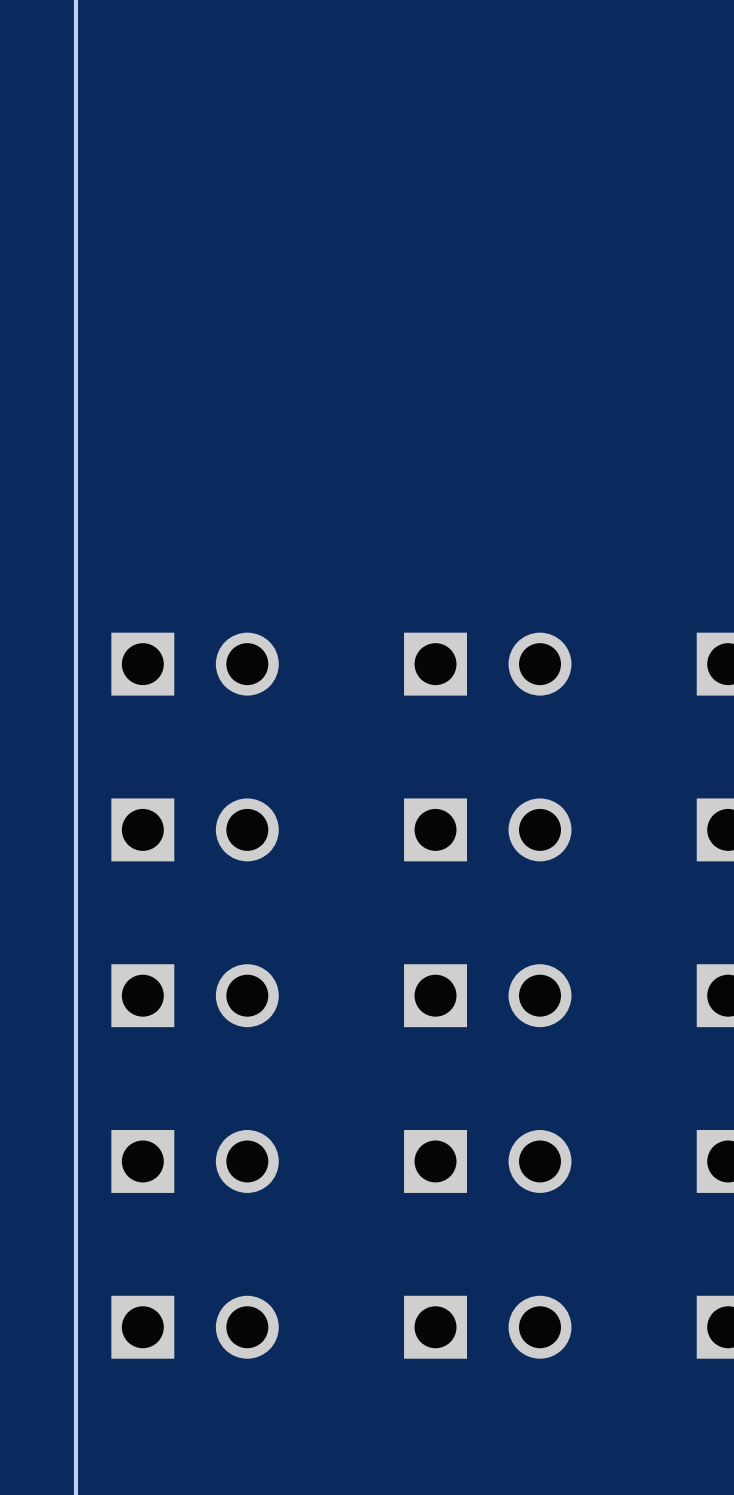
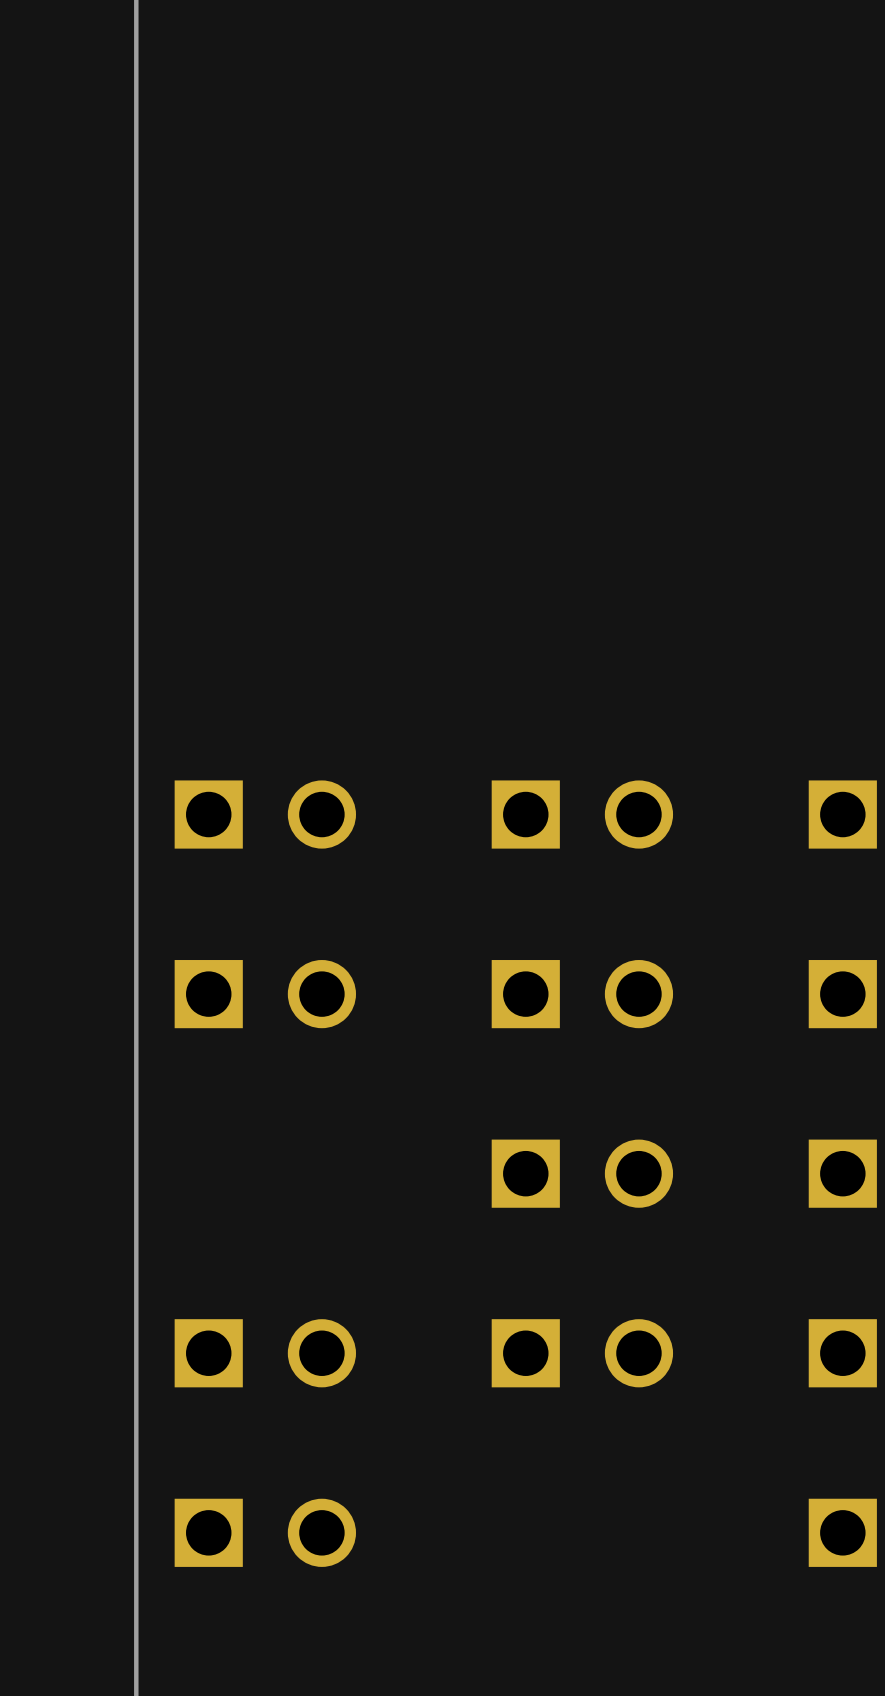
part: (195, 995) -> none
part: (487, 1327) -> none

